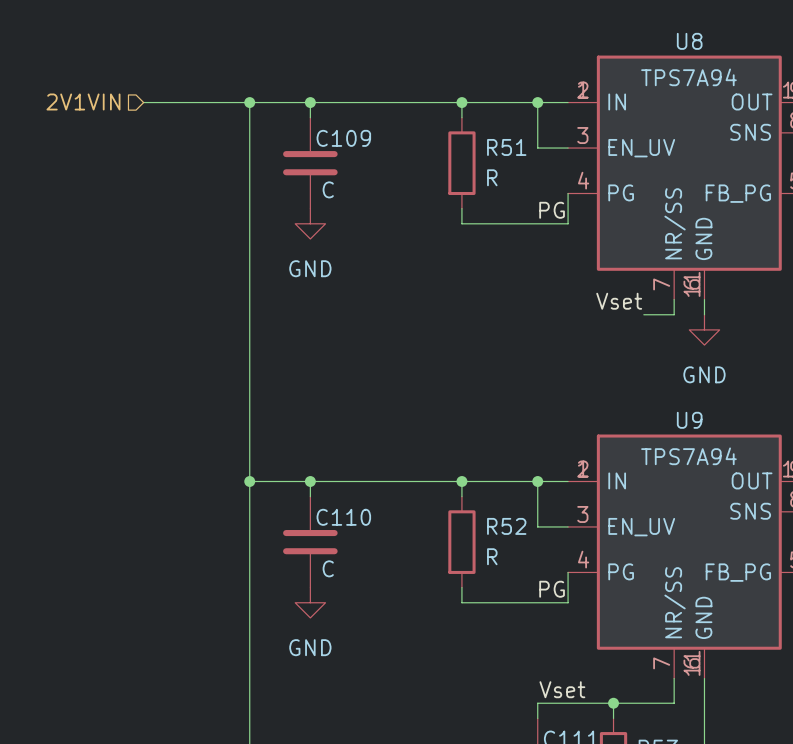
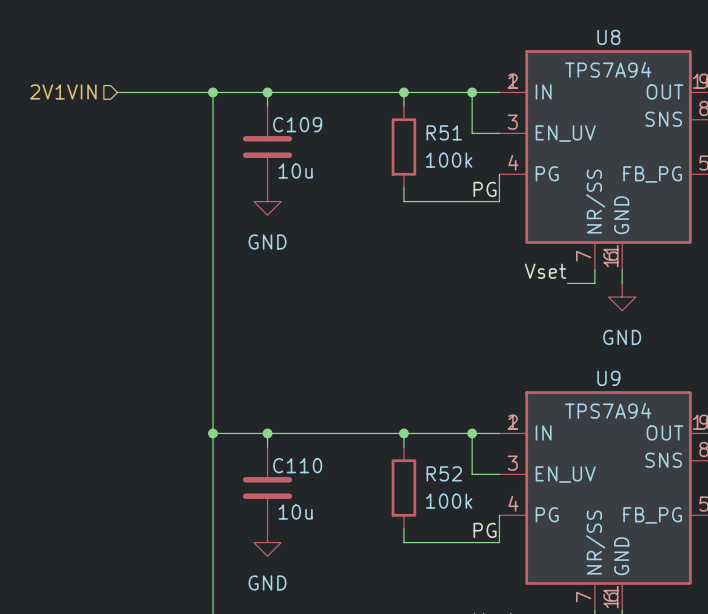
R51 value: R (492, 177) -> 100k (449, 160)
C109 value: C (328, 189) -> 10u (295, 171)
R52 value: R (492, 556) -> 100k (449, 501)
C110 value: C (328, 568) -> 10u (295, 512)

